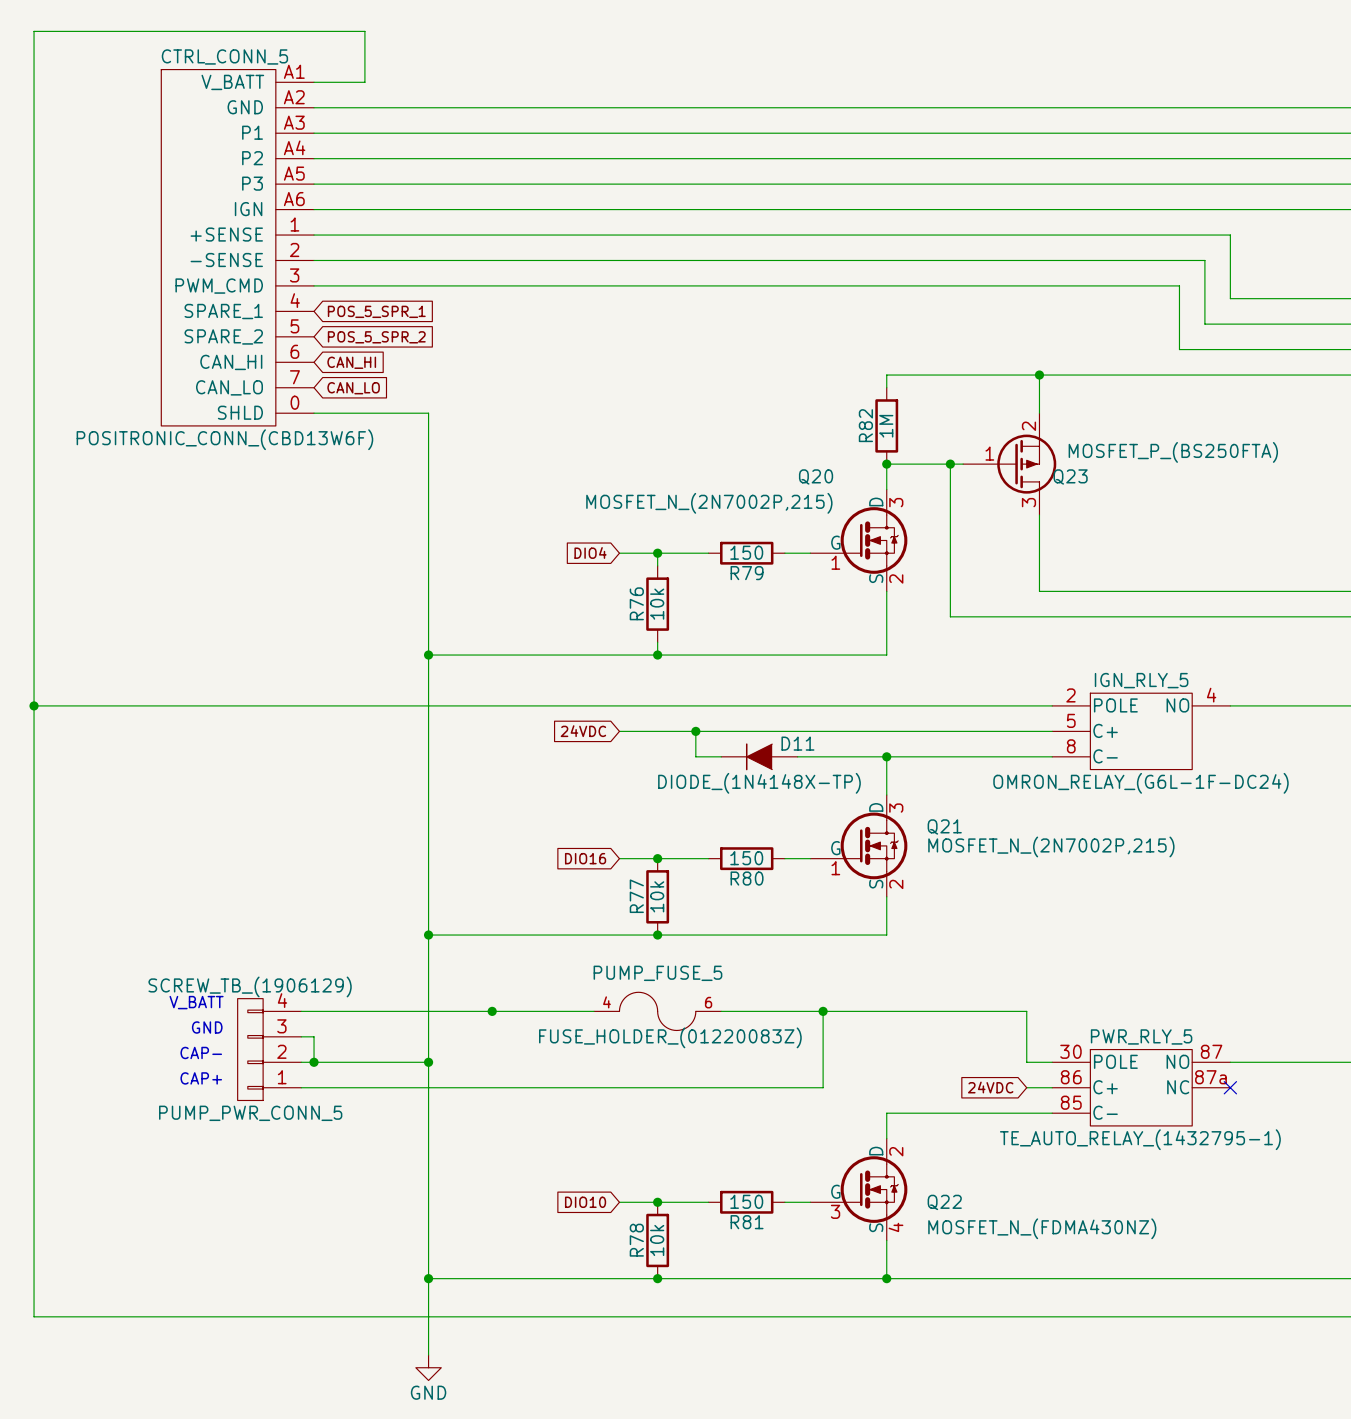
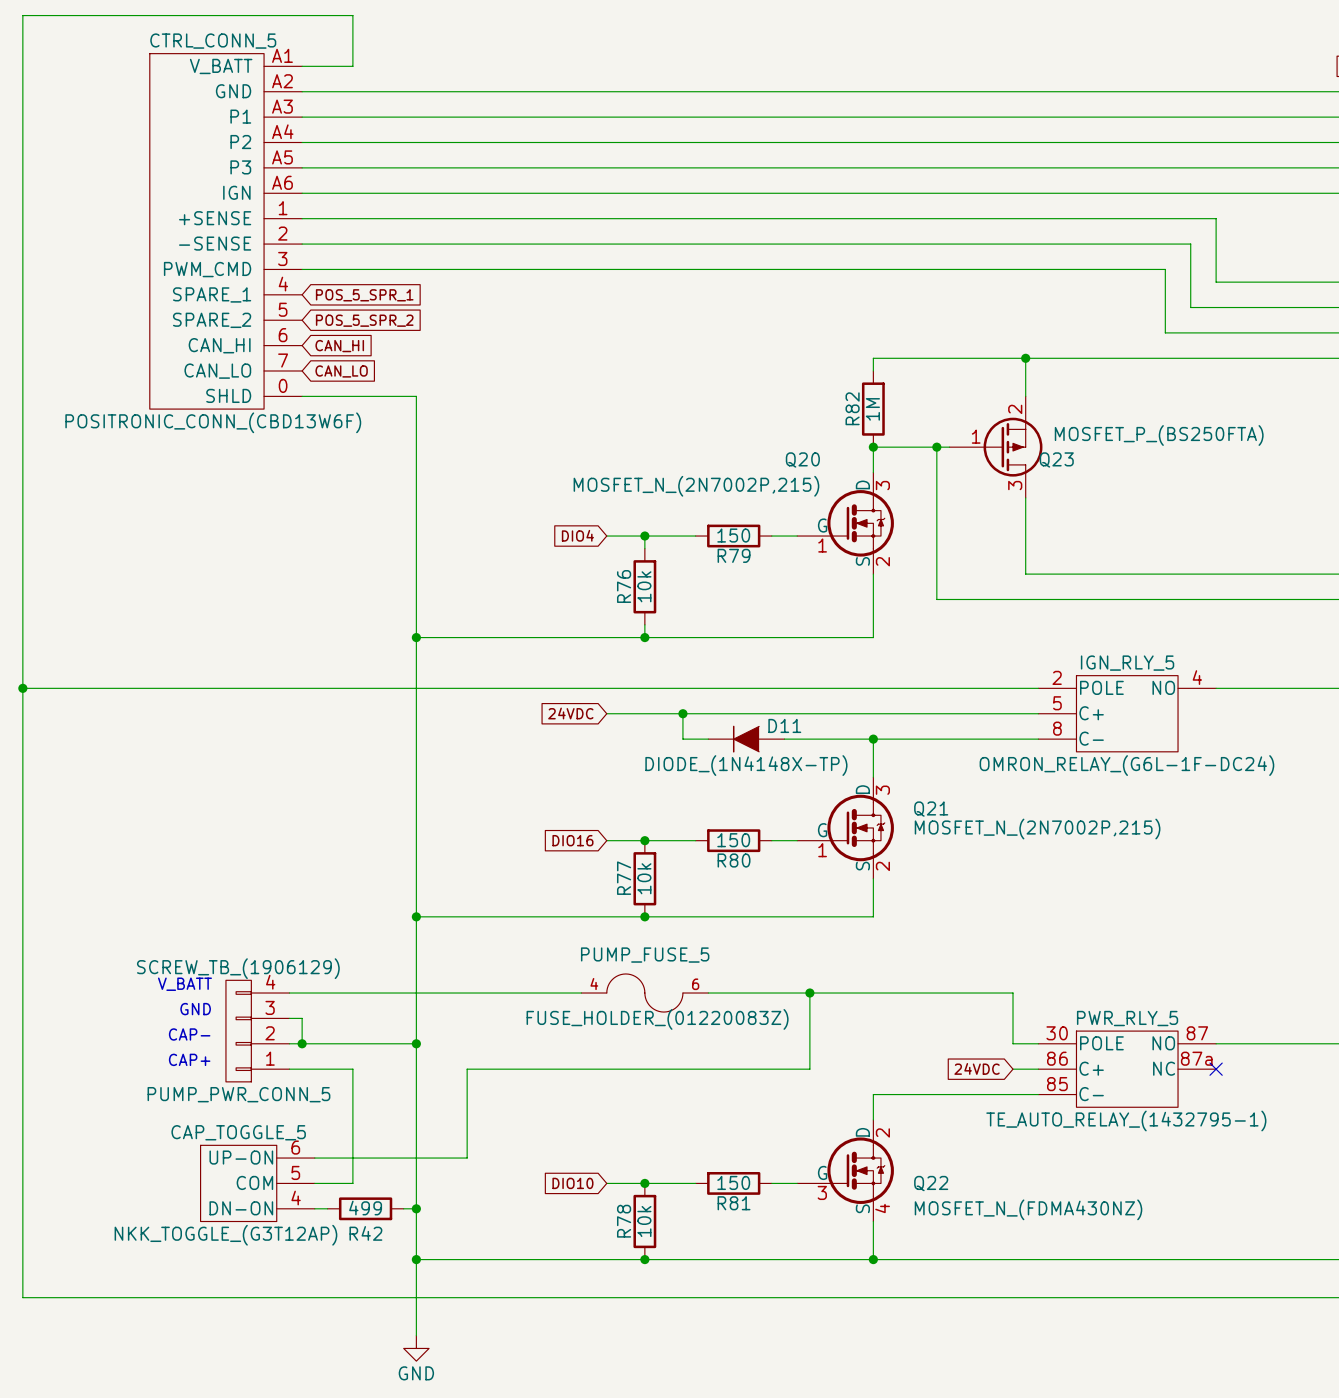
junction: (492, 1011) -> none
wire: (364, 1087) (479, 1087) -> (314, 1158) (467, 1158) (467, 1069)
wire: none -> (352, 1069) (352, 1183) (314, 1183)
CAP_TOGGLE_5: none -> NKK_TOGGLE_(G3T12AP) (257, 1183)
wire: none -> (314, 1208) (327, 1208)
R42: none -> 499 (365, 1208)
wire: none -> (403, 1208) (416, 1208)
junction: none -> (416, 1208)

